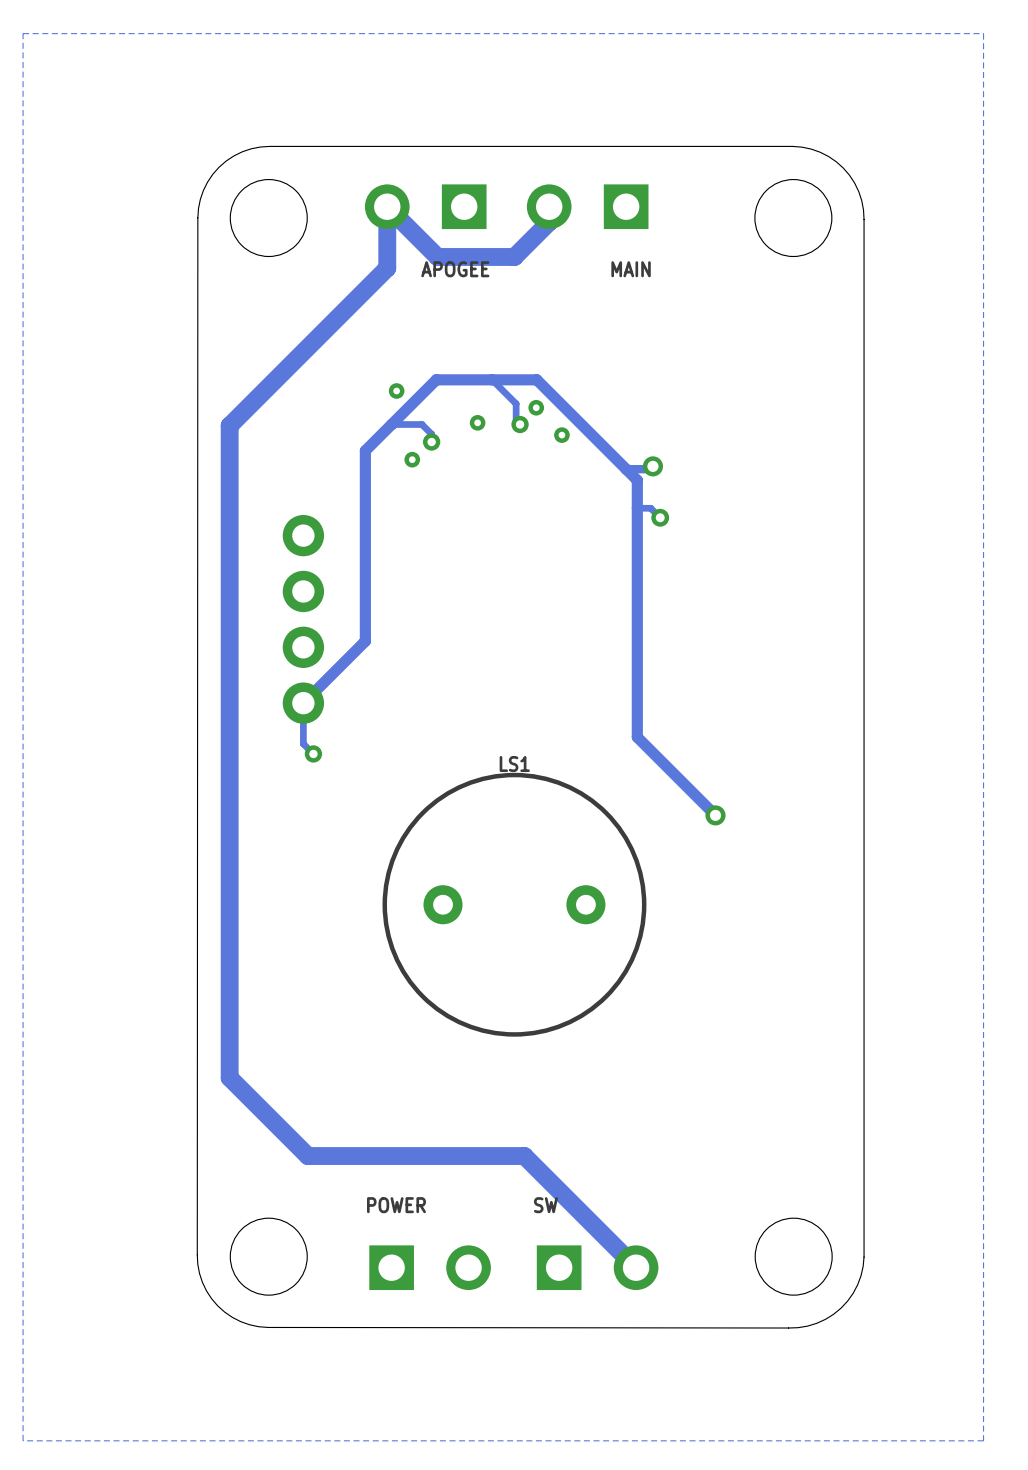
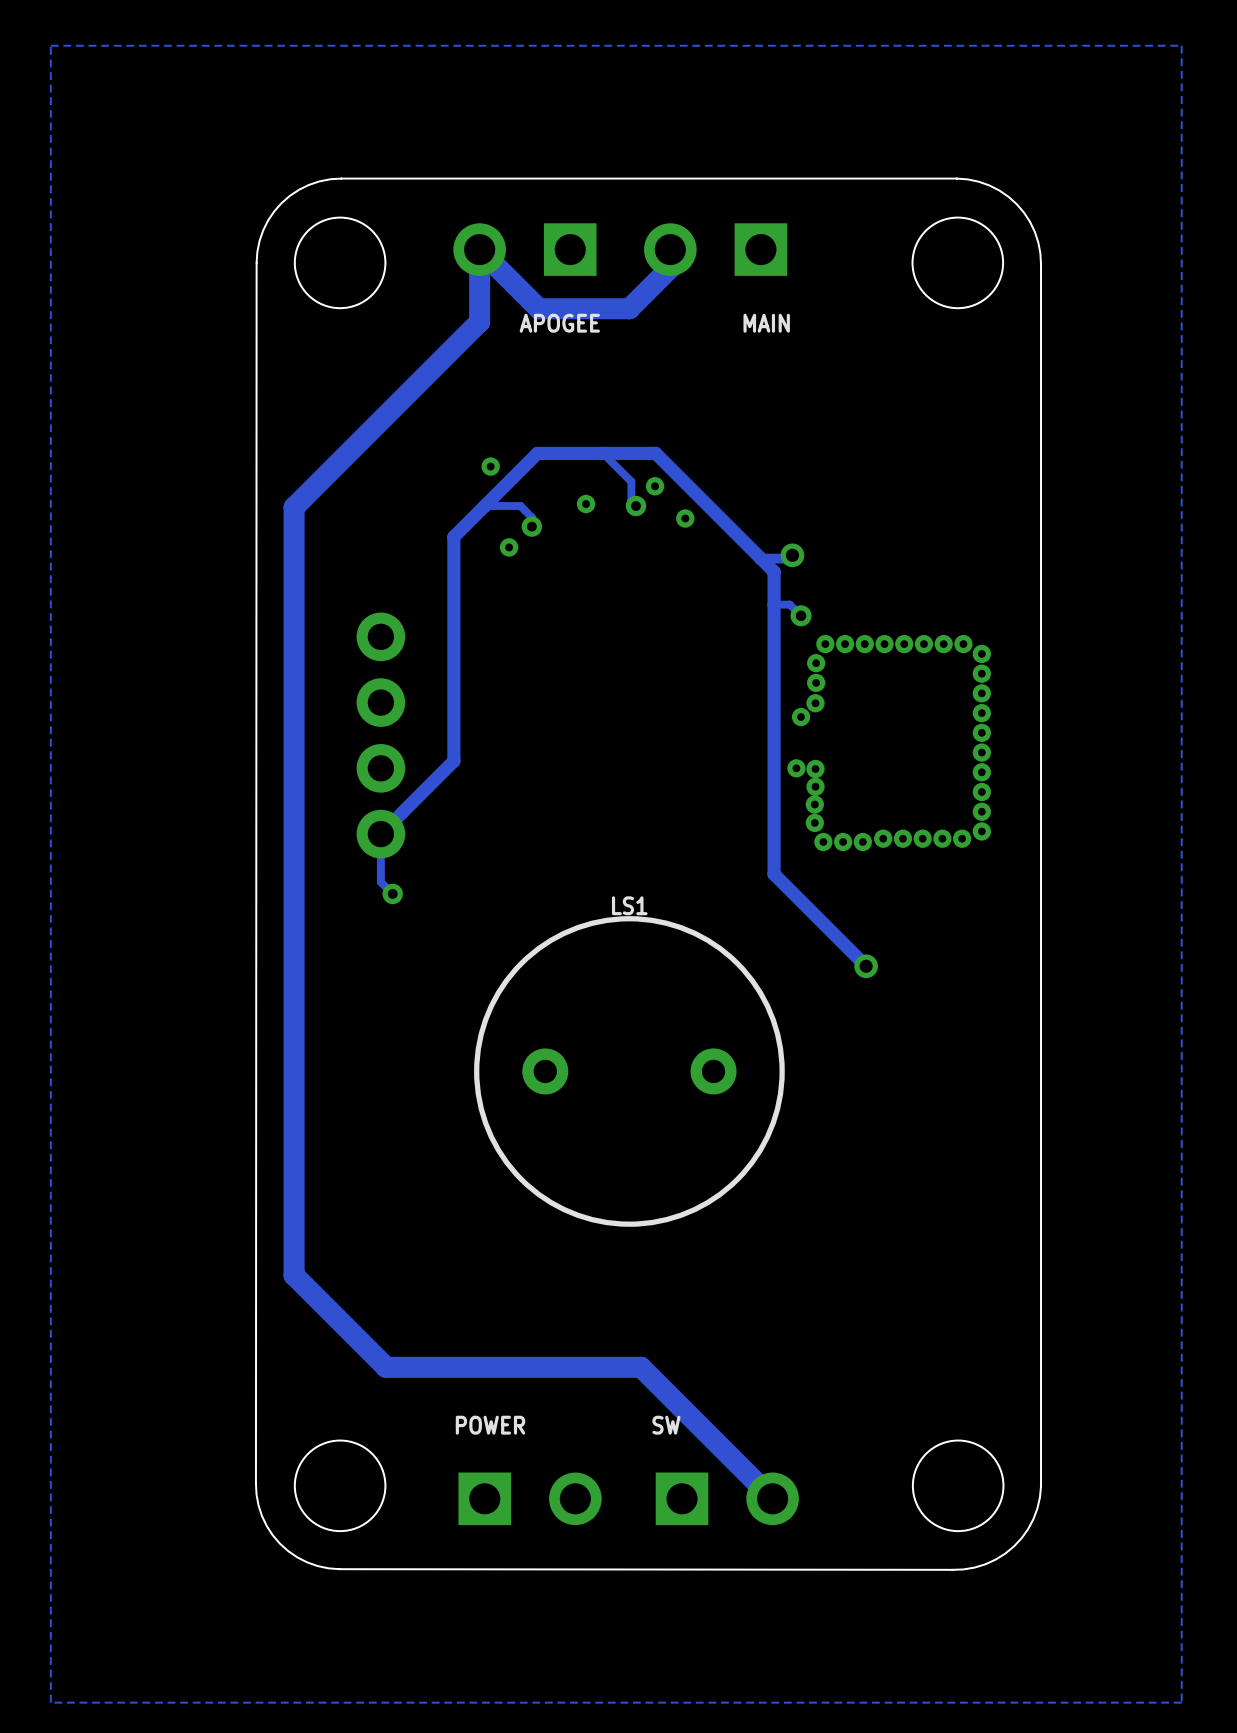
via: none -> (825, 644)
via: none -> (845, 644)
via: none -> (864, 644)
via: none -> (884, 644)
via: none -> (904, 644)
via: none -> (923, 644)
via: none -> (943, 644)
via: none -> (963, 644)
via: none -> (981, 653)
via: none -> (816, 663)
via: none -> (981, 673)
via: none -> (816, 682)
via: none -> (981, 693)
via: none -> (815, 703)
via: none -> (981, 713)
via: none -> (801, 717)
via: none -> (981, 732)
via: none -> (981, 752)
via: none -> (796, 768)
via: none -> (815, 769)
via: none -> (981, 772)
via: none -> (815, 786)
via: none -> (981, 792)
via: none -> (814, 804)
via: none -> (981, 811)
via: none -> (814, 822)
via: none -> (981, 831)
via: none -> (883, 838)
via: none -> (902, 838)
via: none -> (922, 838)
via: none -> (942, 838)
via: none -> (962, 838)
via: none -> (823, 841)
via: none -> (843, 841)
via: none -> (862, 841)

